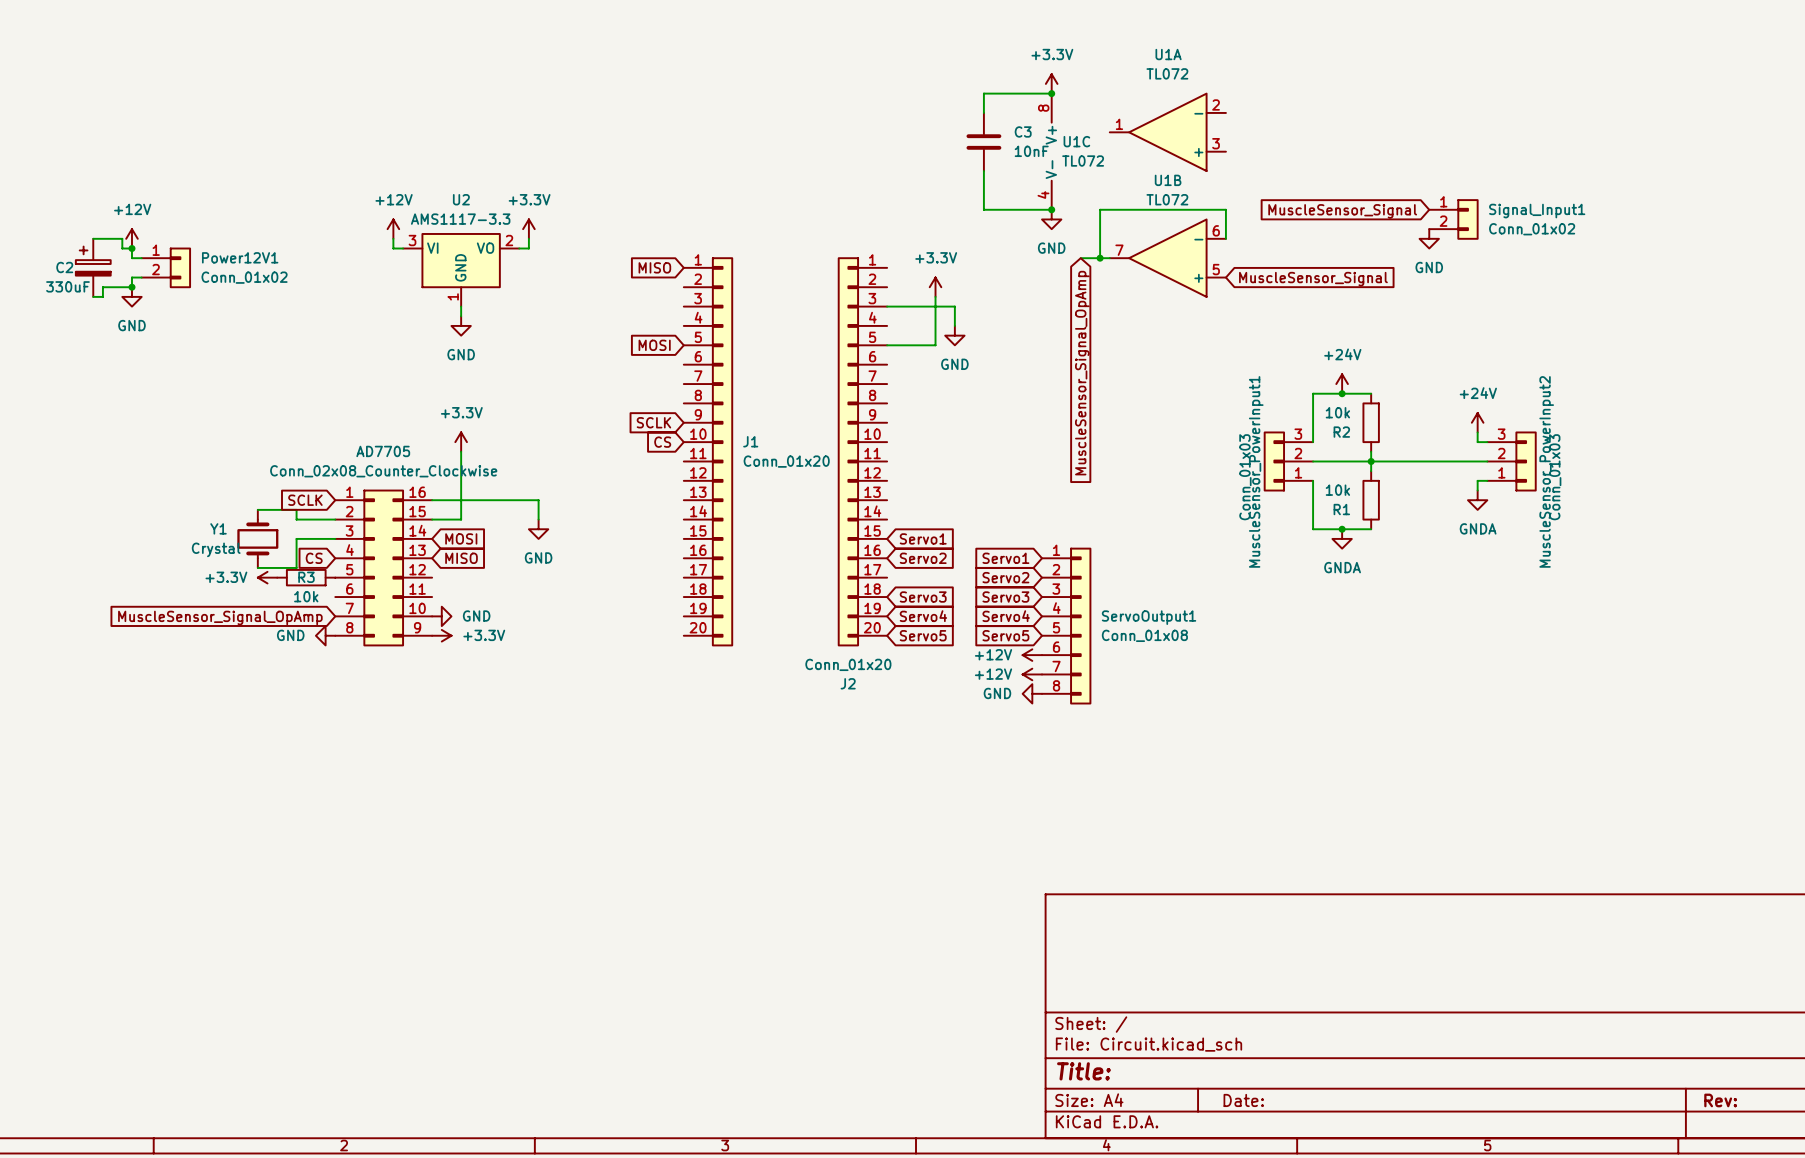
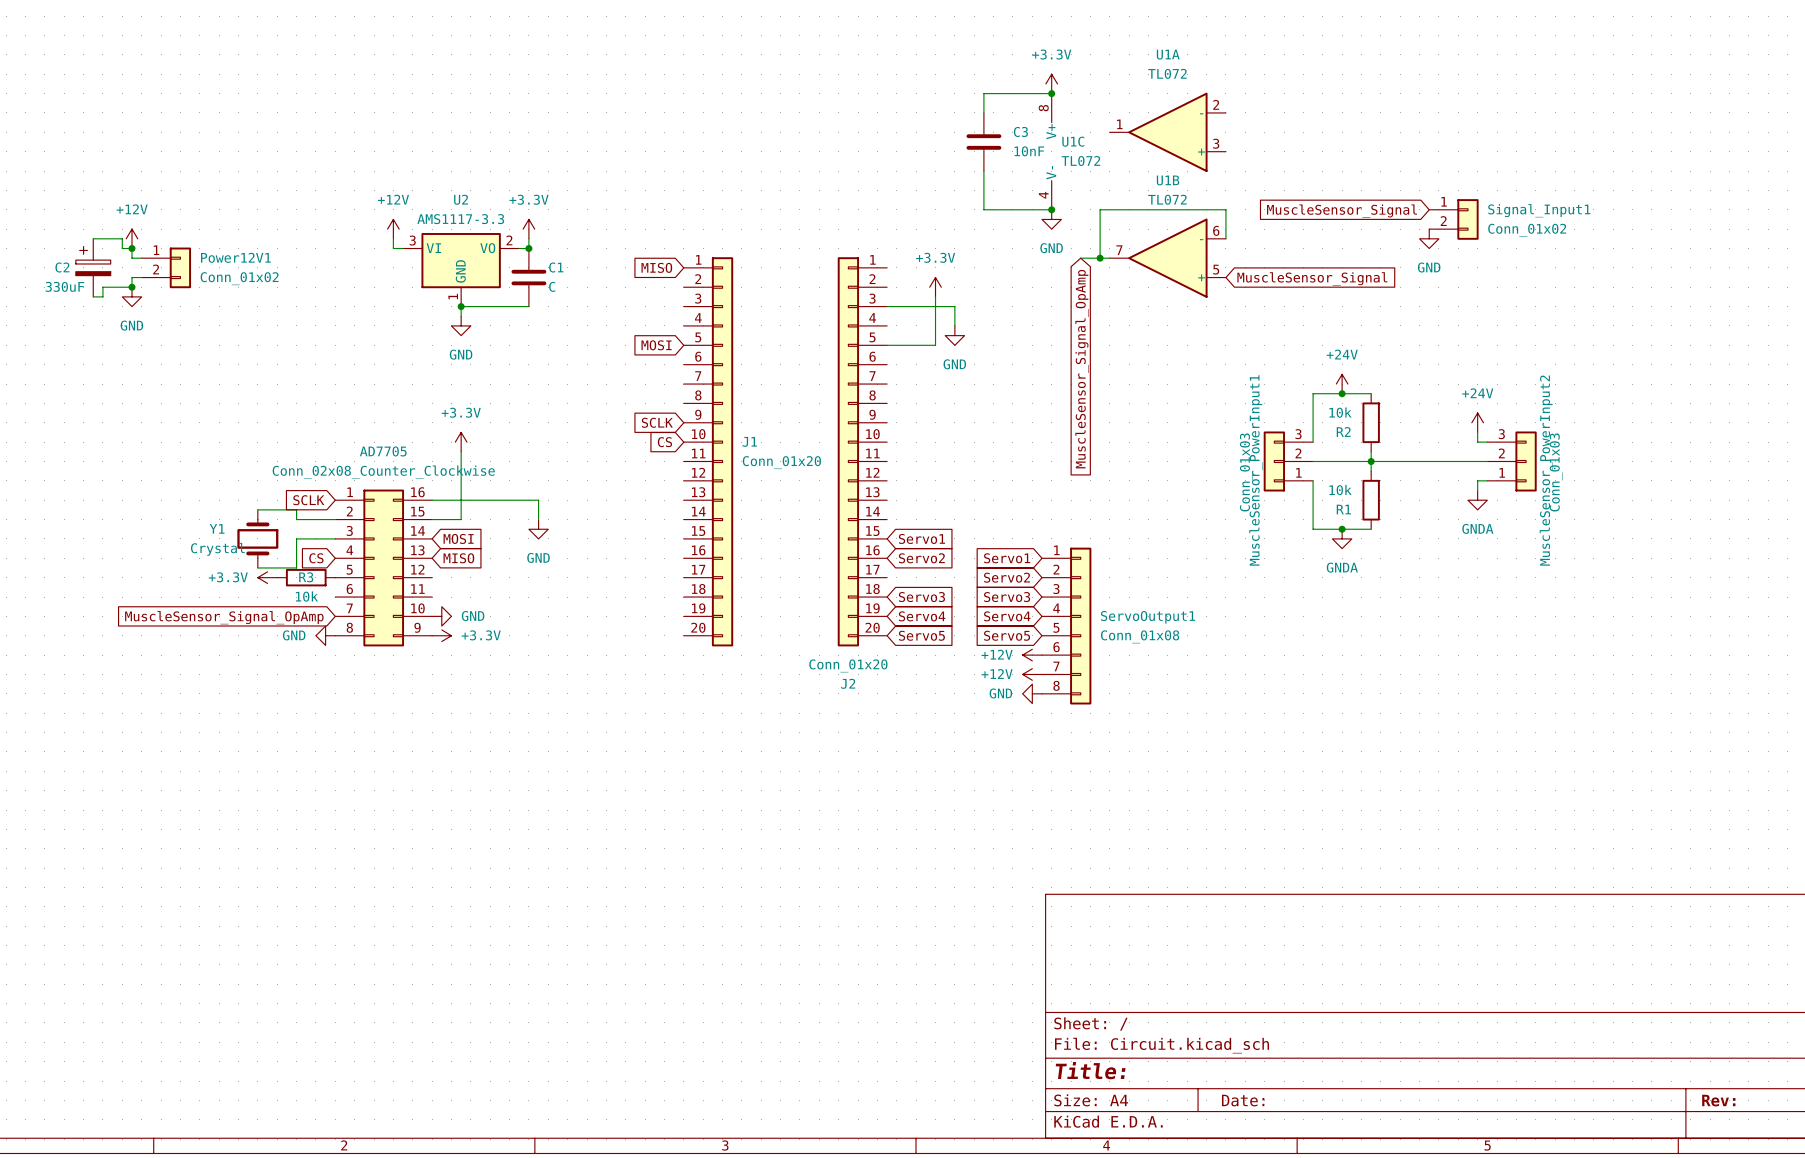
junction: none -> (528, 248)
C1: none -> C (528, 277)
wire: none -> (461, 306) (528, 306)
junction: none -> (461, 306)

